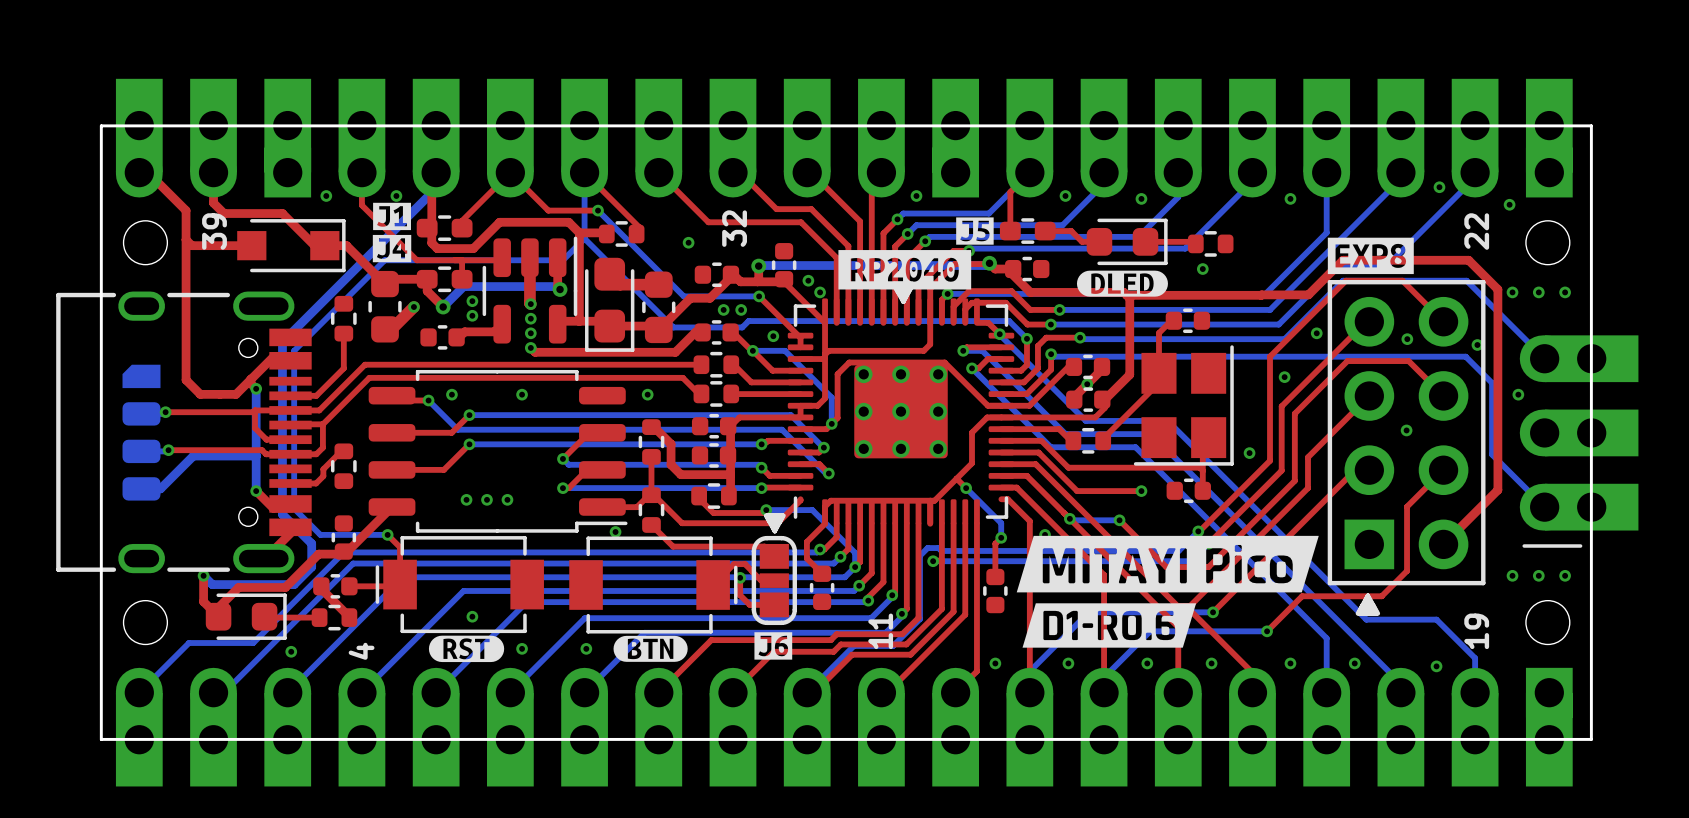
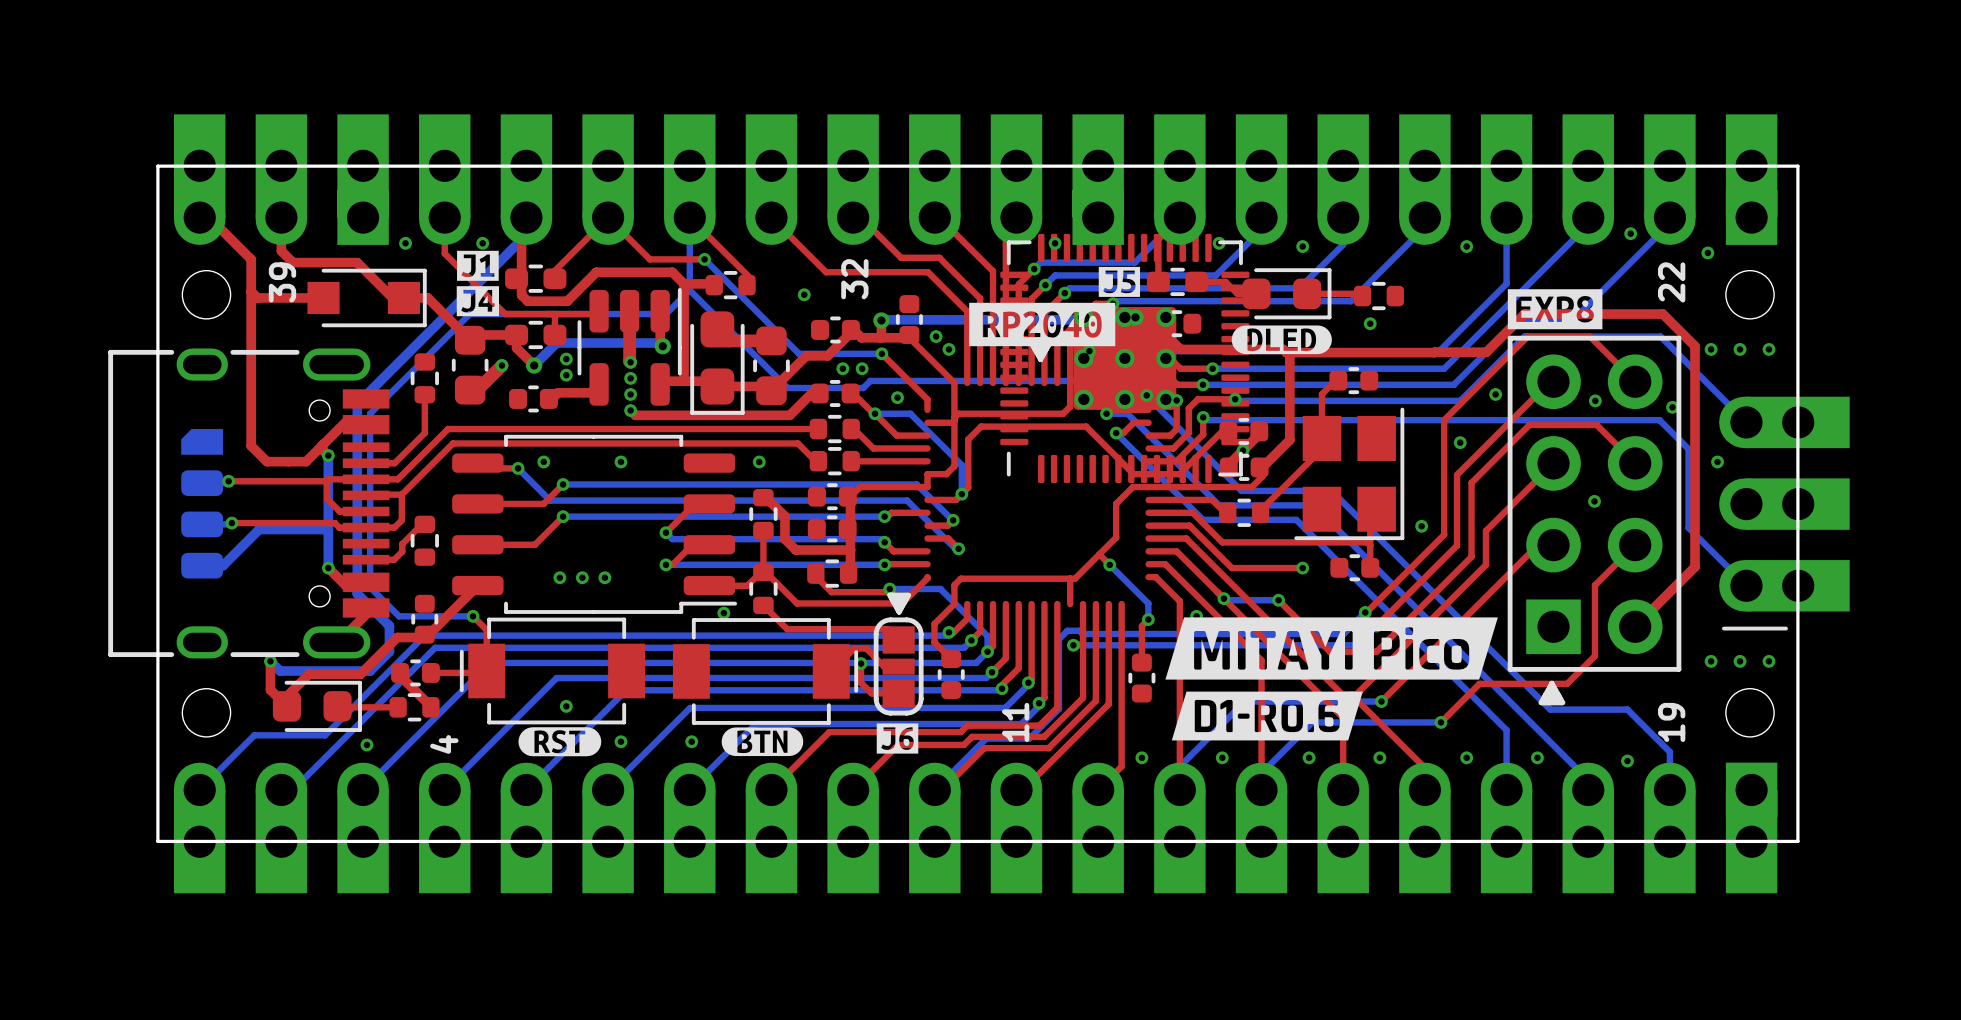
part position: (901, 411) -> (1124, 358)

